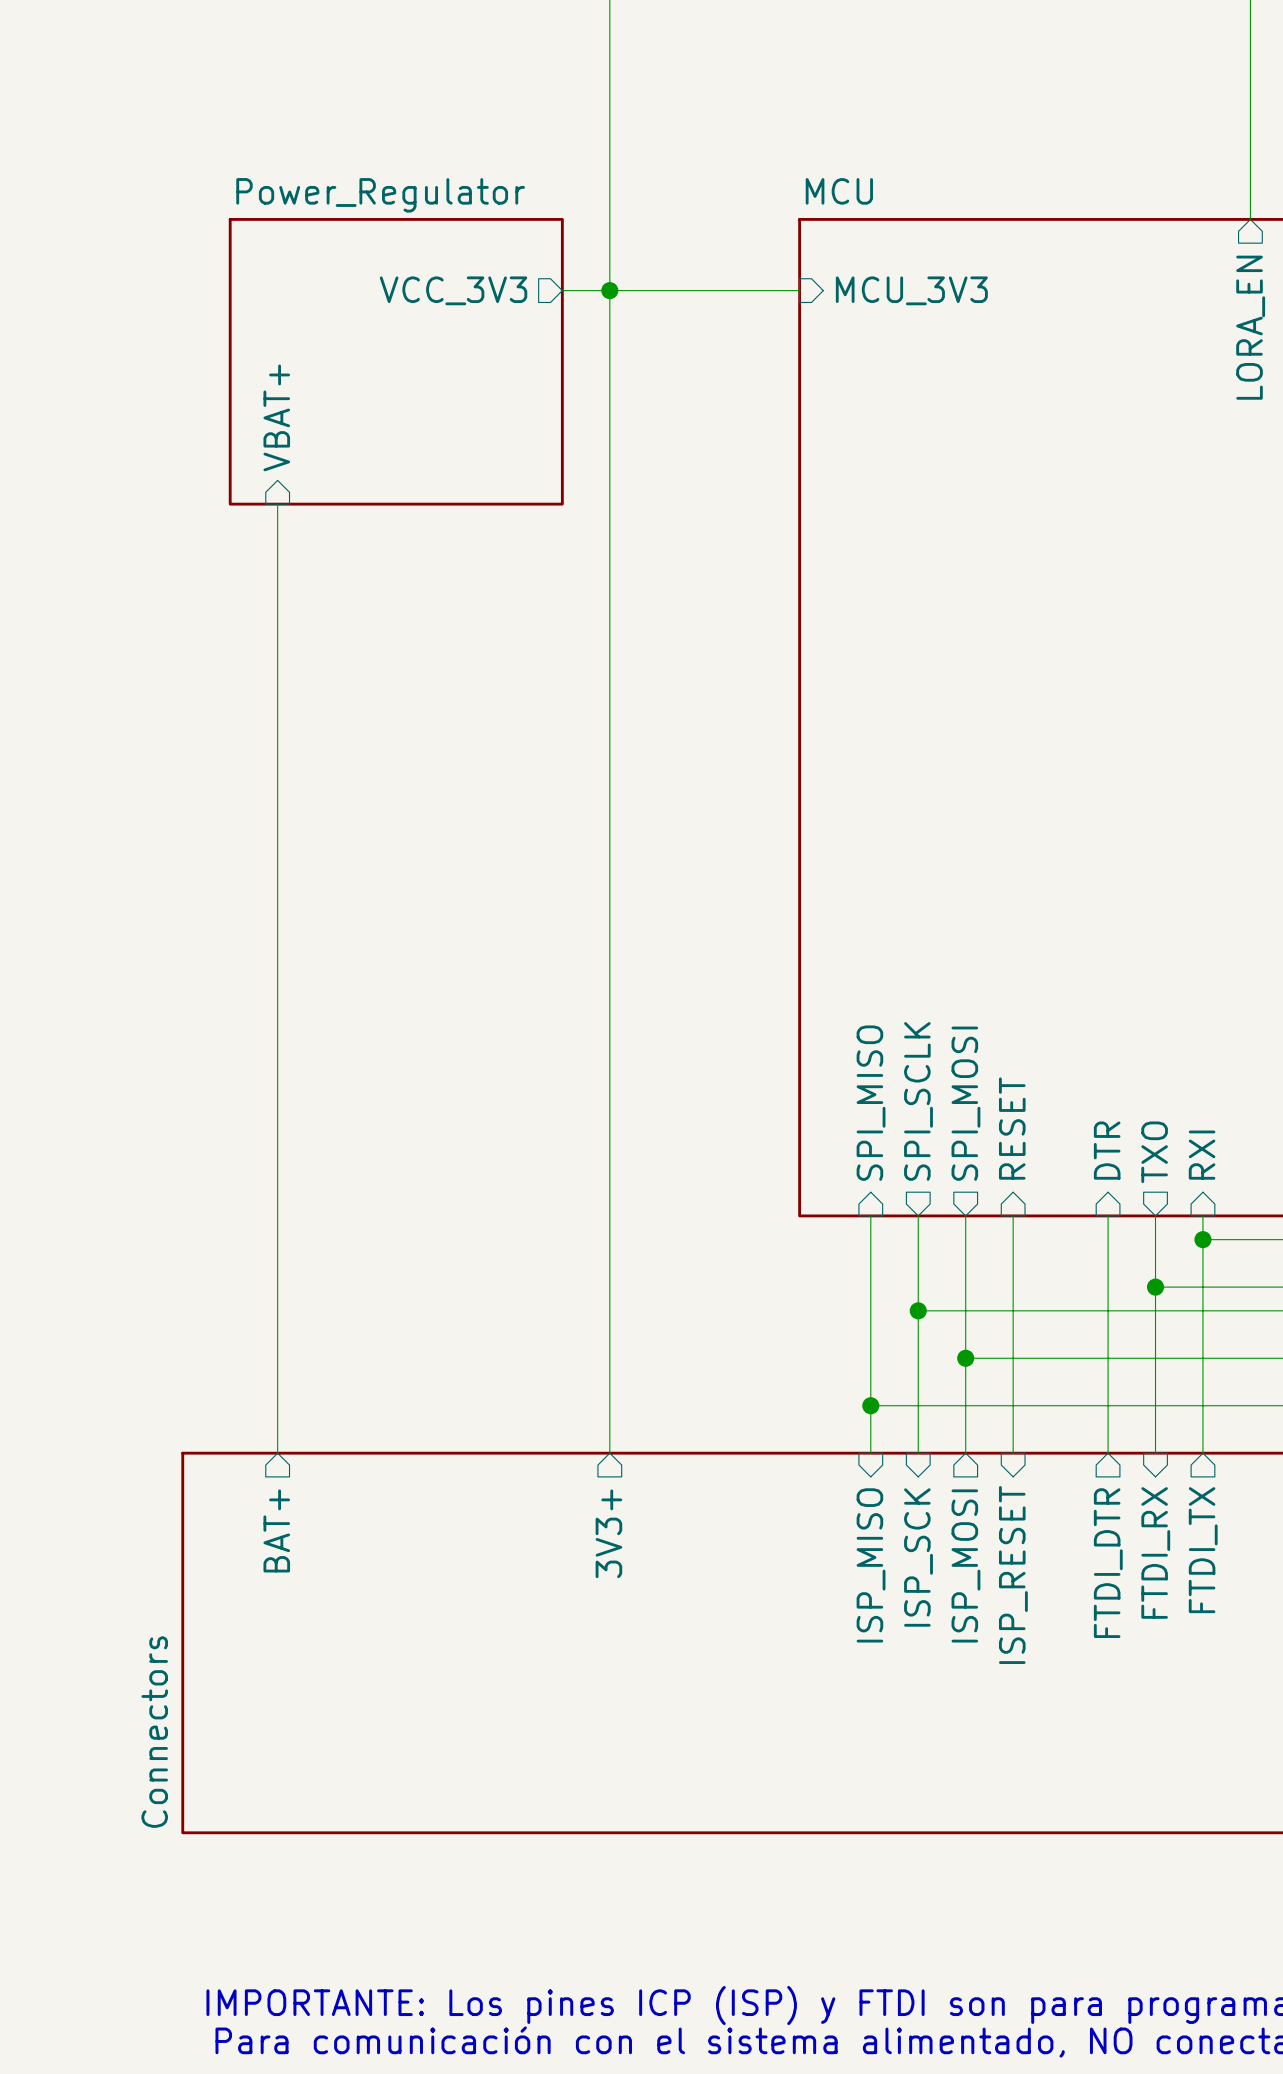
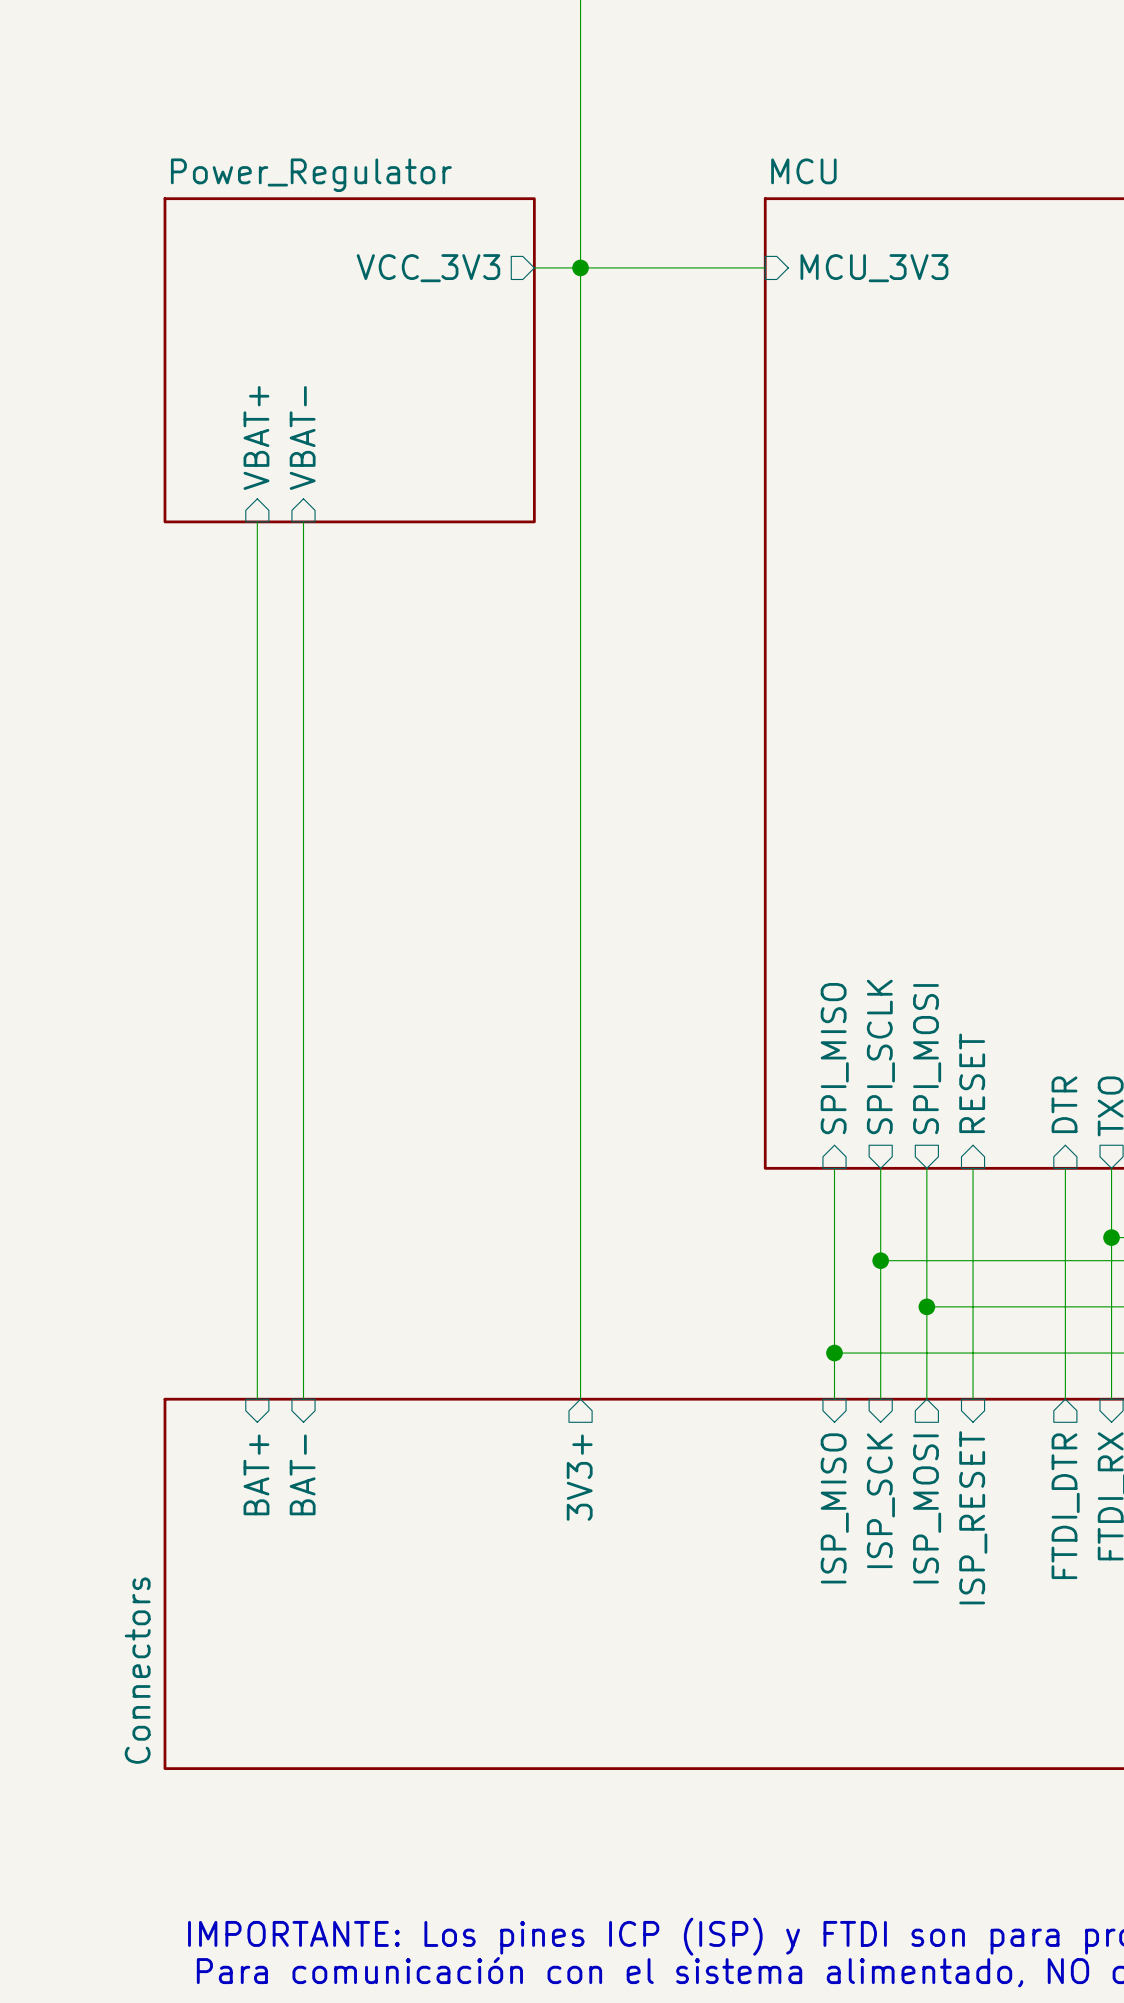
sheet Power_Regulator: (396, 361) -> none
sheet Power_Regulator: none -> (349, 360)
sheet pin position: VBAT+ (276, 417) -> VBAT+ (256, 437)
sheet pin: none -> VBAT- (302, 437)
wire: (277, 504) (277, 551) -> none
wire: none -> (303, 521) (303, 1399)
sheet pin shape: output (276, 1530) -> input (256, 1474)
sheet pin: none -> BAT- (302, 1474)

